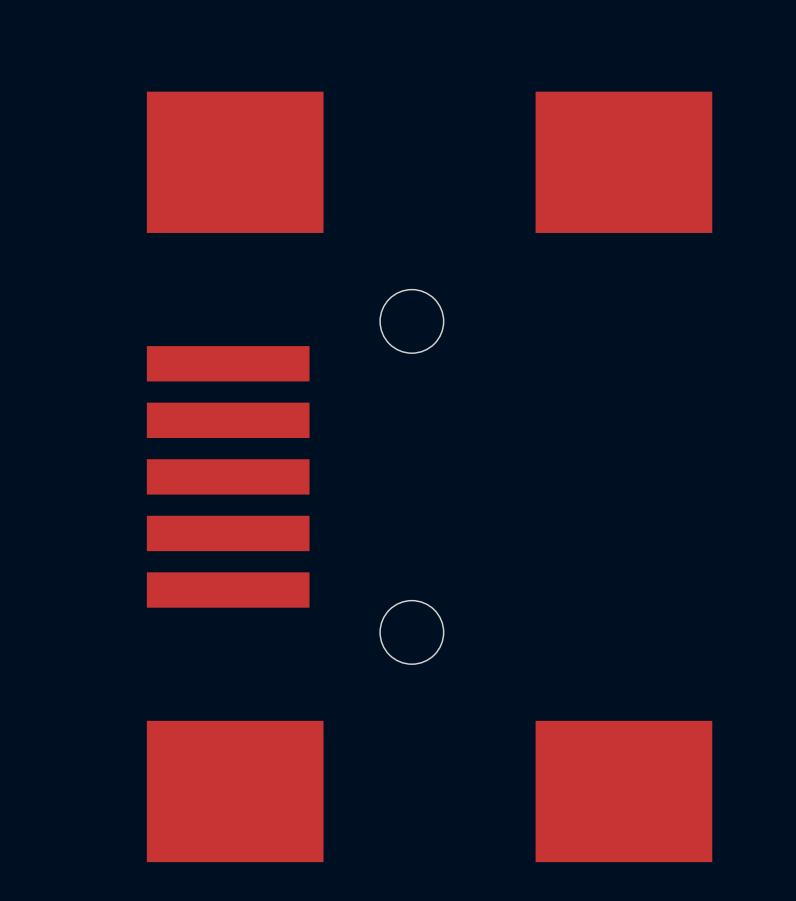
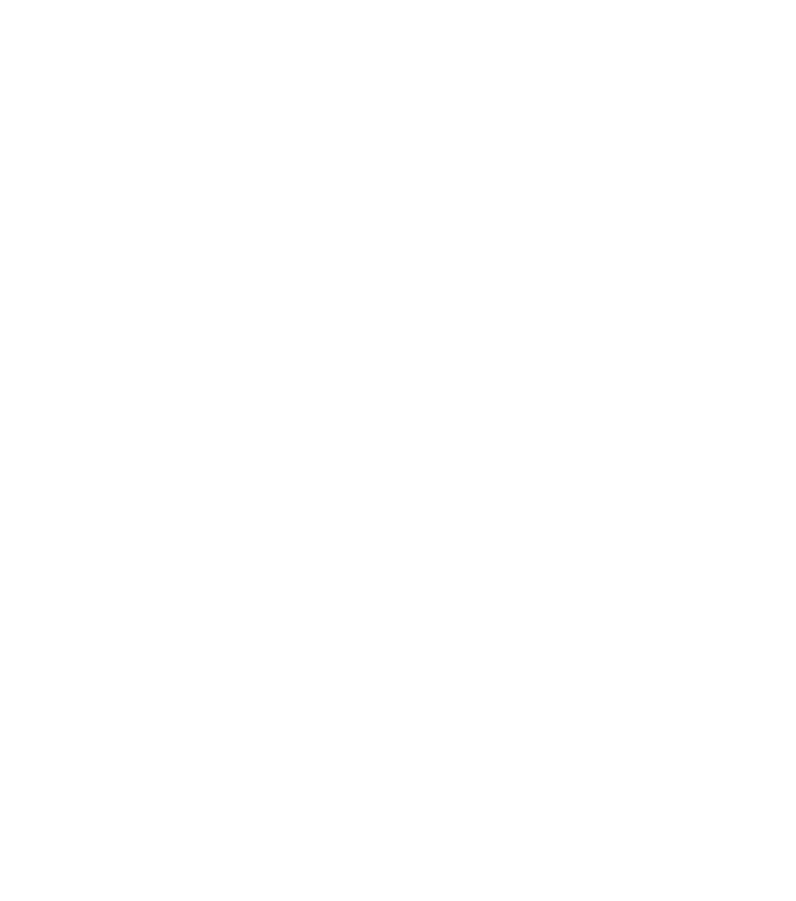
part: (429, 476) -> none

